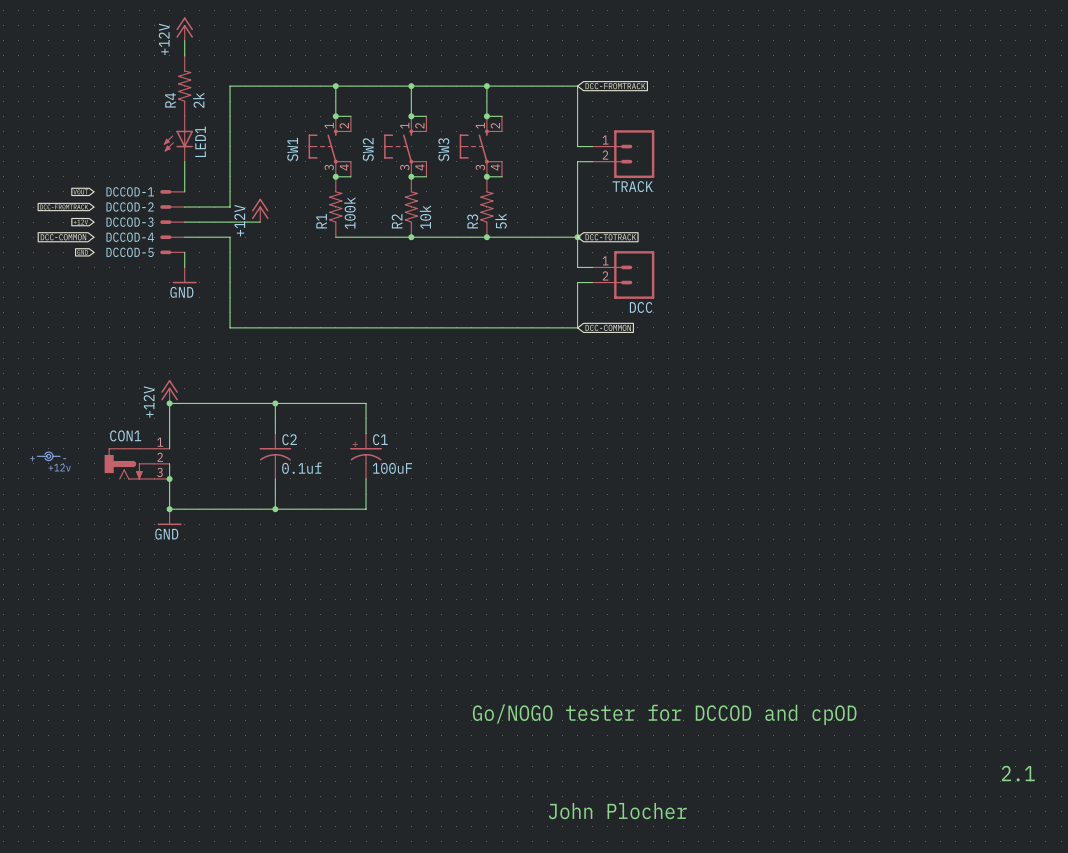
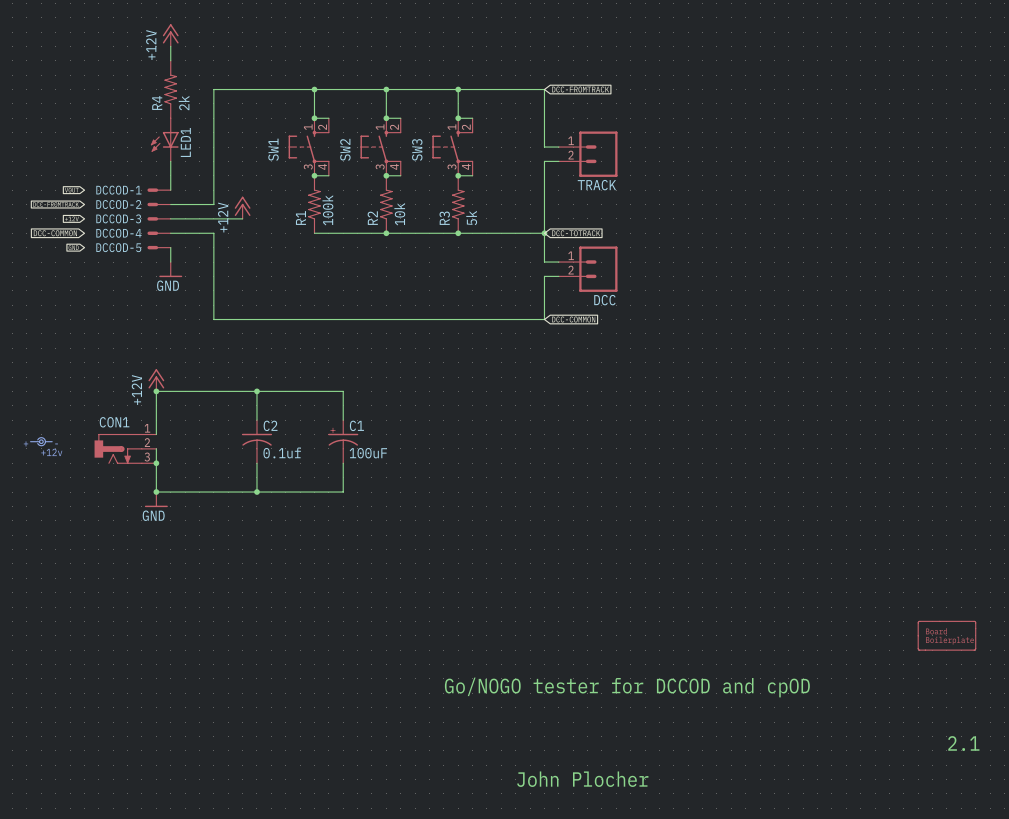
part: none -> (946, 635)

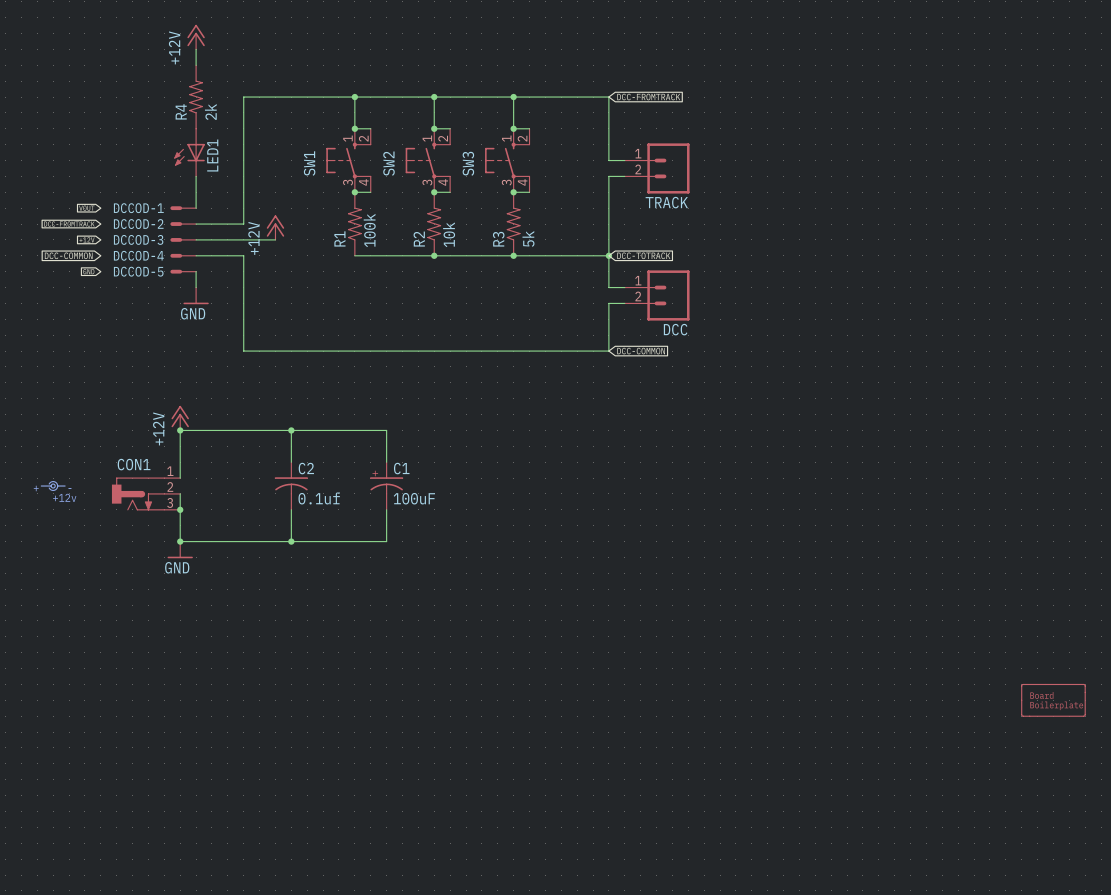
text: Go/NOGO tester for DCCOD and cpOD (627, 687) -> none
text: 2.1 (963, 743) -> none
text: John Plocher (582, 779) -> none

